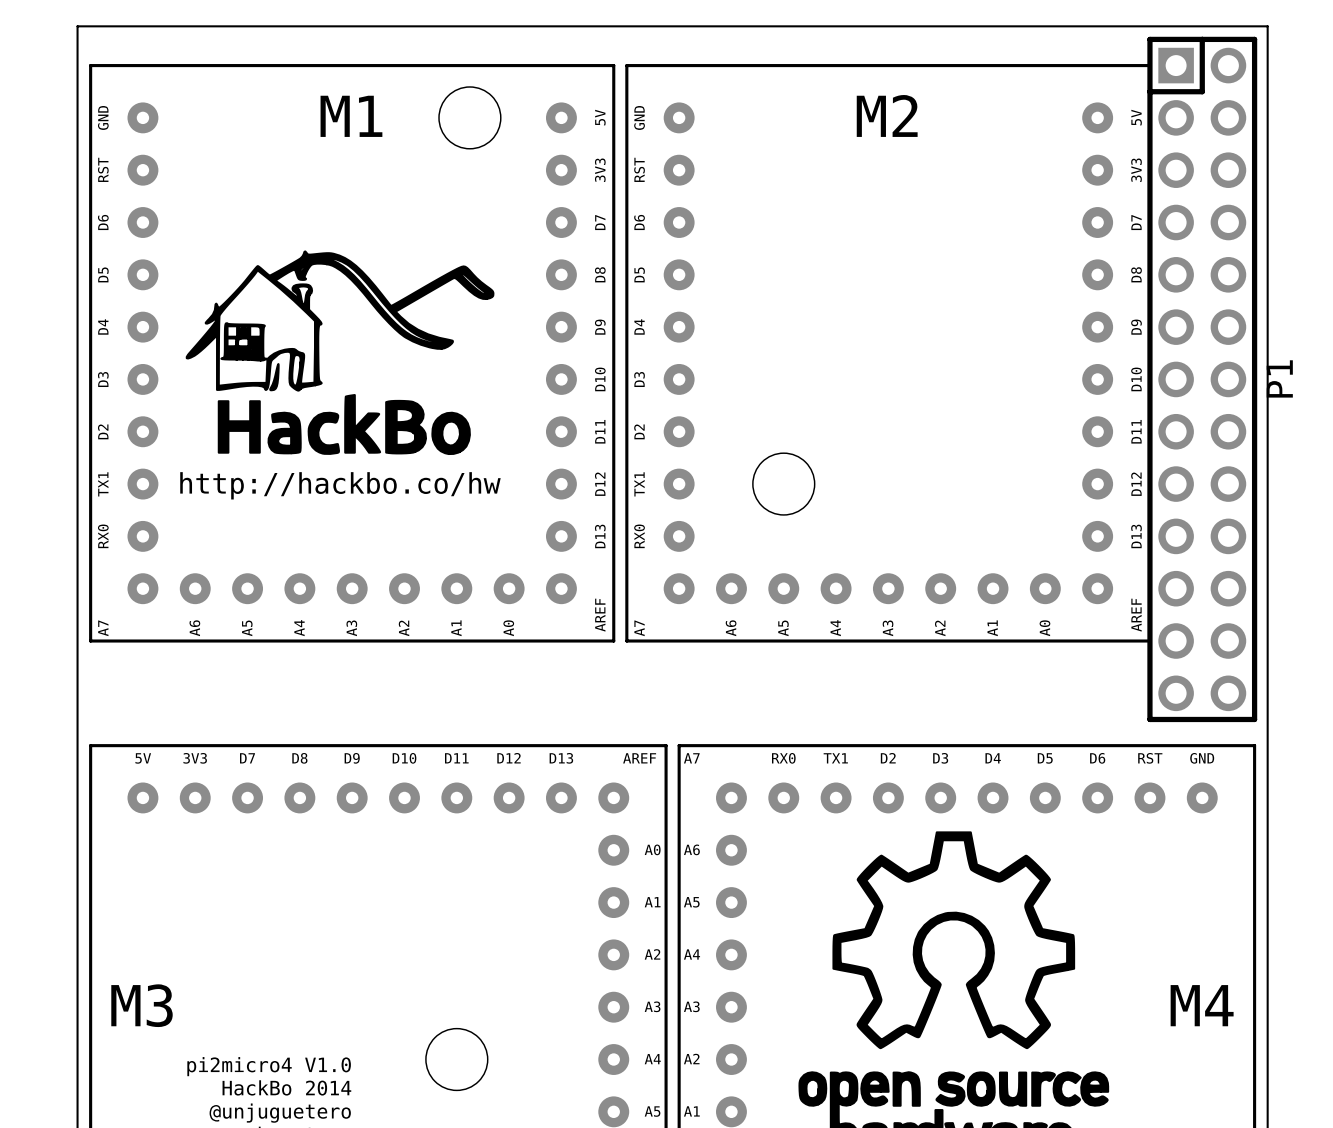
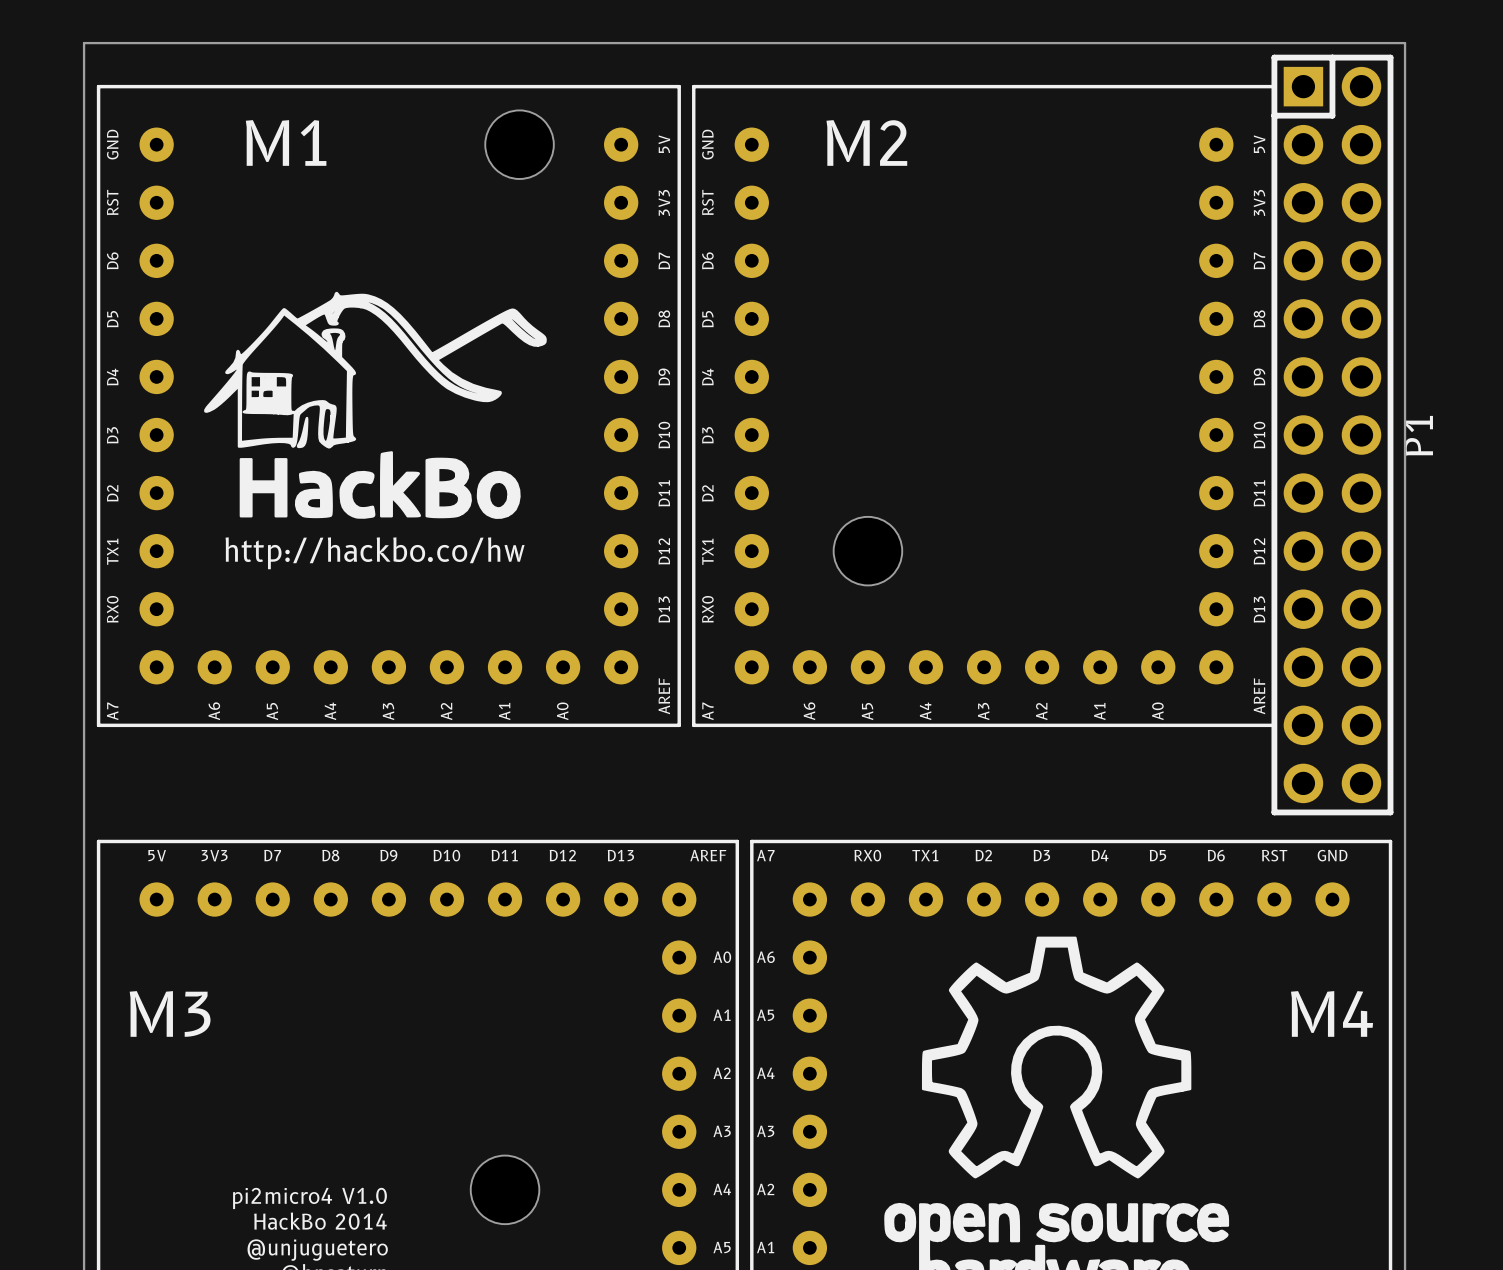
M2 name position: M2 (887, 115) -> M2 (866, 142)
M1 name position: M1 (351, 116) -> M1 (286, 142)
M3 name position: M3 (142, 1005) -> M3 (170, 1013)
M4 name position: M4 (1202, 1005) -> M4 (1332, 1013)

